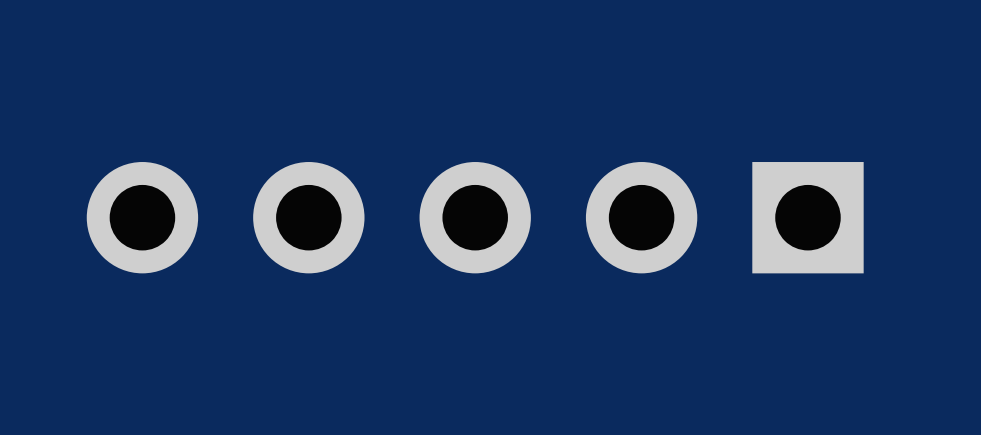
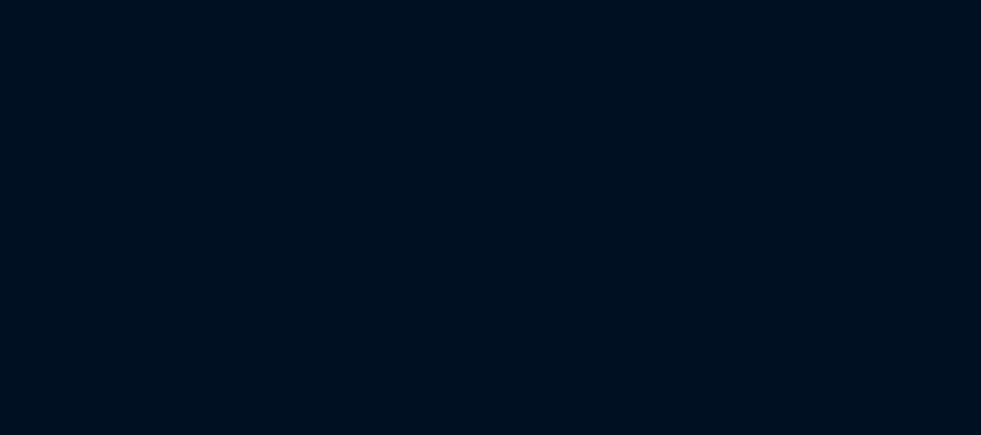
part: (475, 217) -> none

